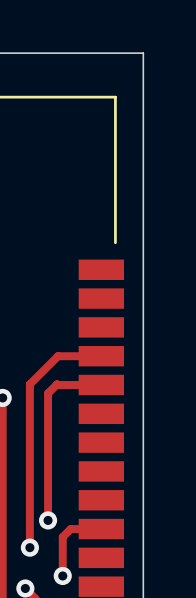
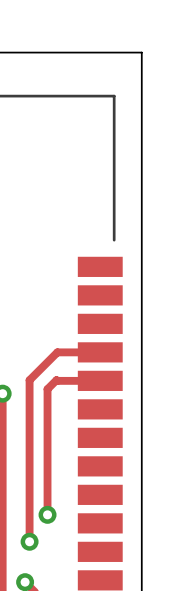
track: (101, 529) (70, 529) (62, 537) (62, 575) -> none
via: (62, 575) -> none

